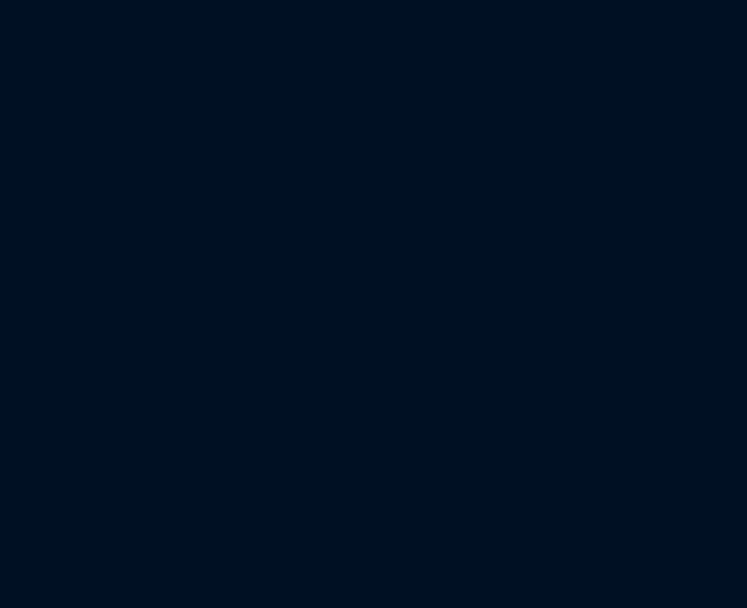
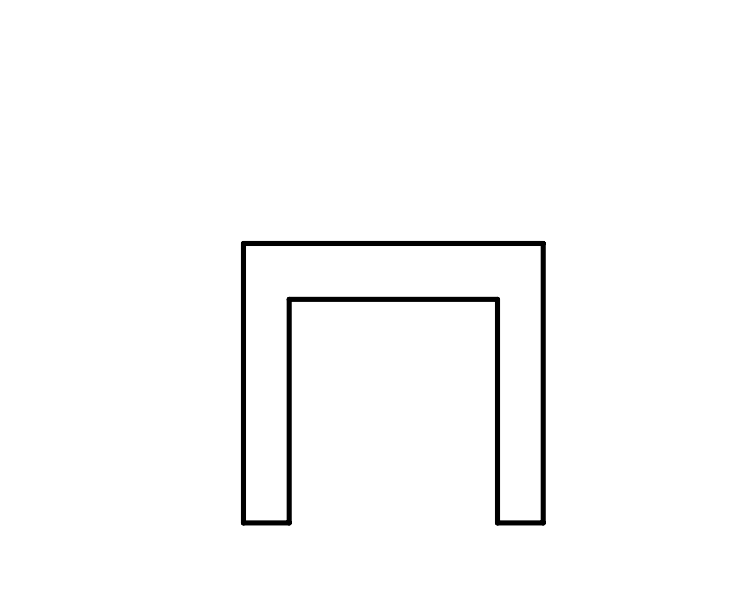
board edge: none -> (543, 243) (543, 522) (497, 522) (497, 299) (289, 299) (289, 522) (243, 522) (243, 243) (543, 243)

